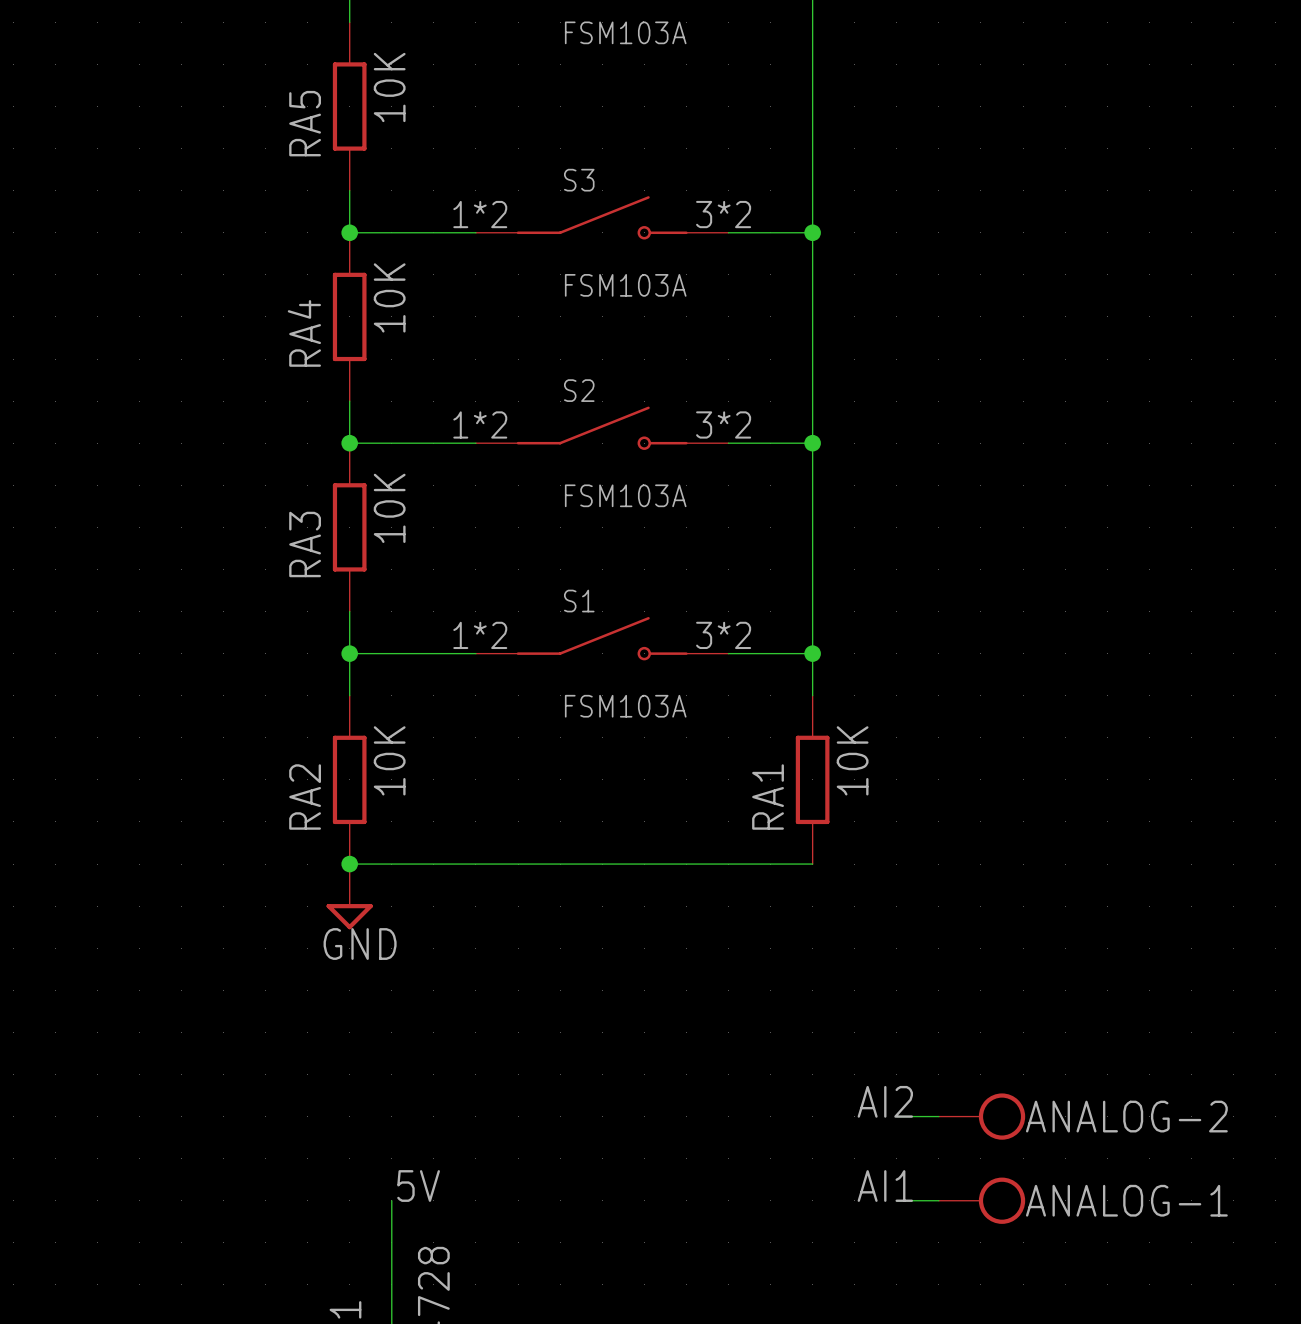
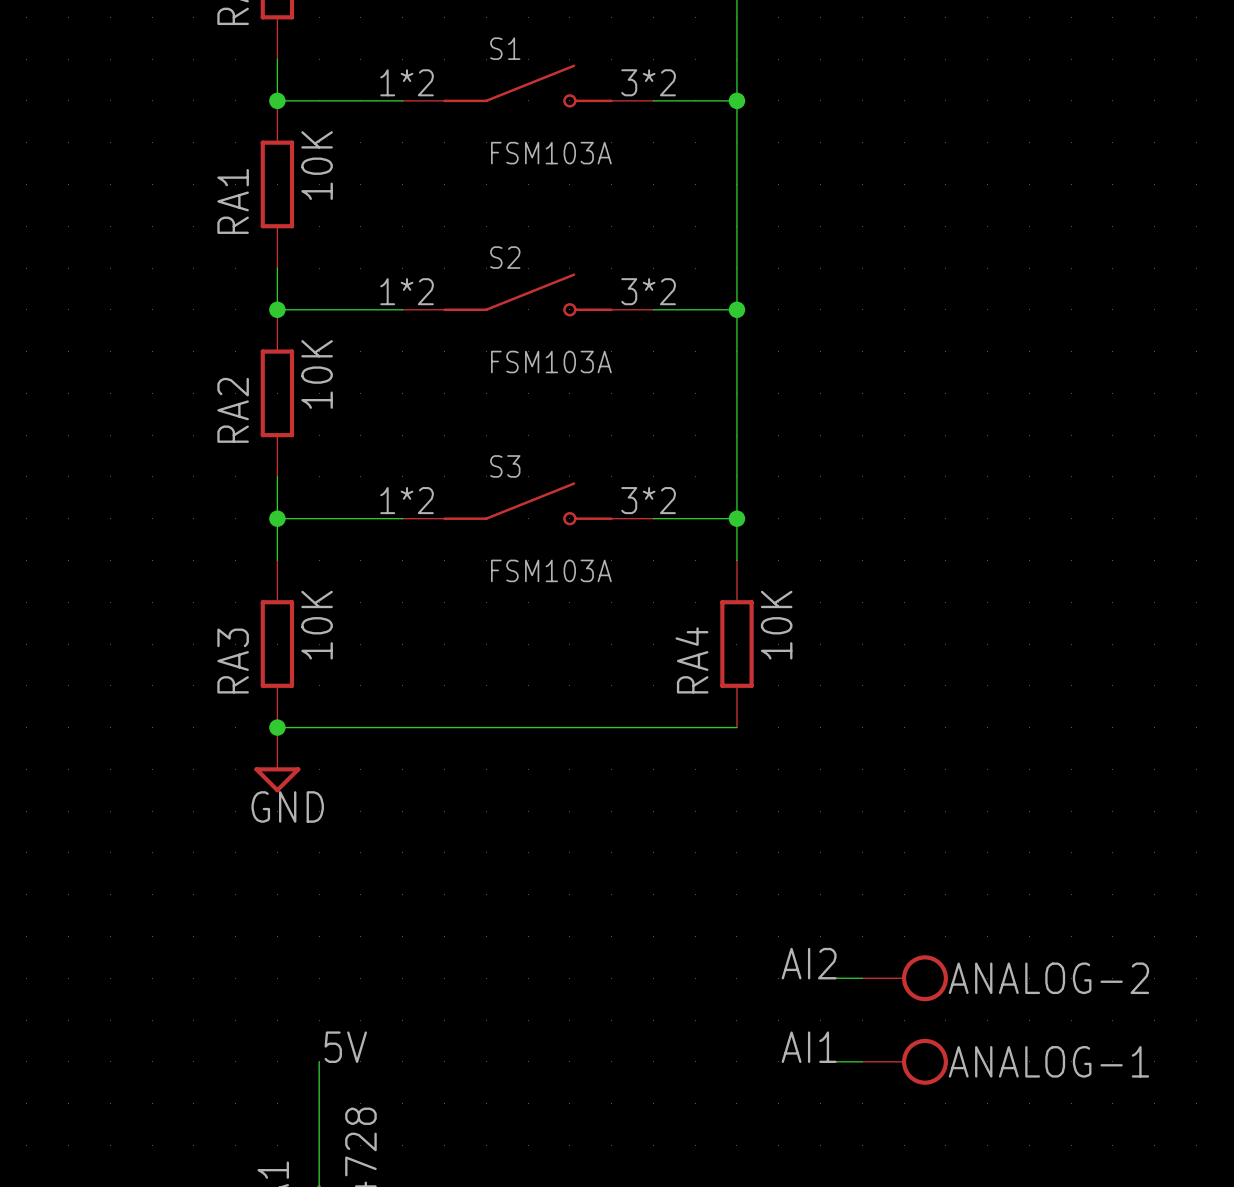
S3 name: S3 (579, 180) -> S1 (505, 48)
RA4 name: RA4 (304, 333) -> RA1 (233, 201)
RA3 name: RA3 (305, 544) -> RA2 (233, 410)
S1 name: S1 (579, 601) -> S3 (505, 466)
RA2 name: RA2 (305, 797) -> RA3 (233, 661)
RA1 name: RA1 (768, 797) -> RA4 (691, 660)

